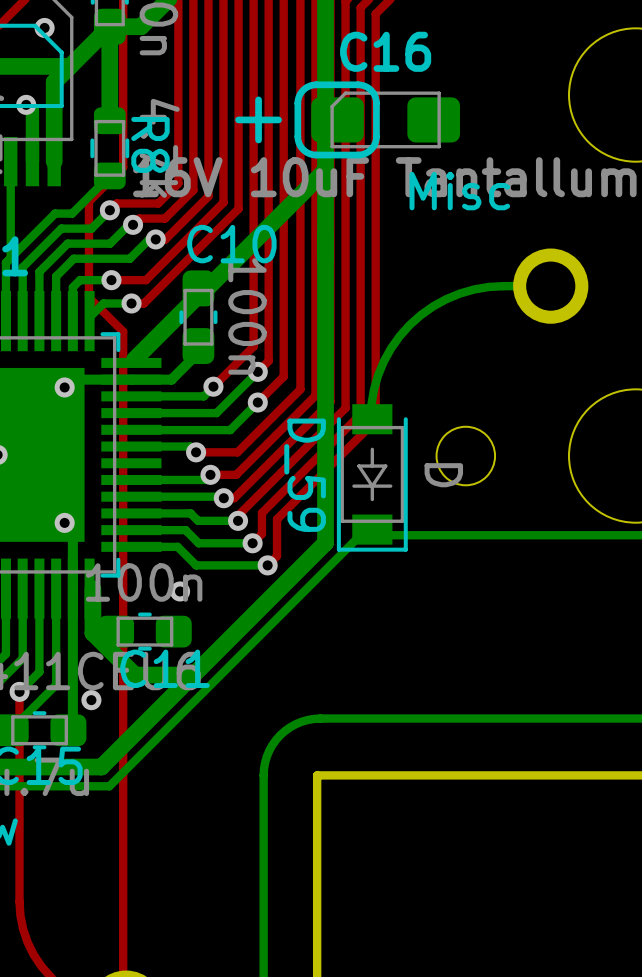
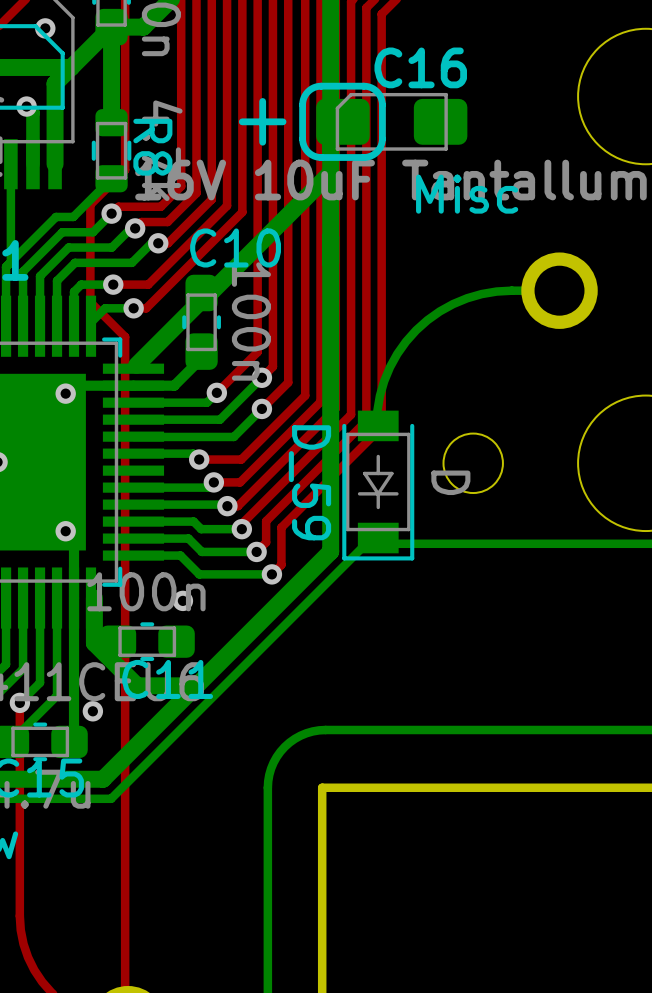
C16 name position: C16 (385, 51) -> C16 (420, 67)

